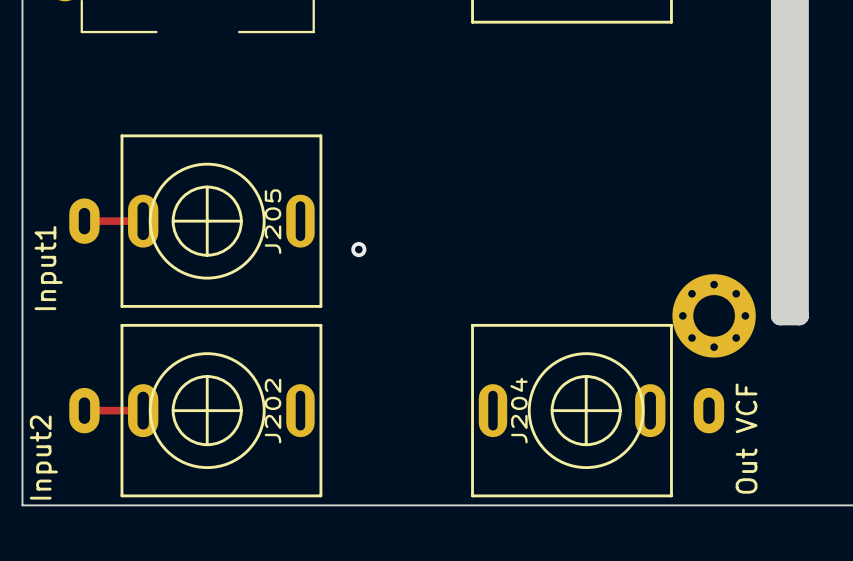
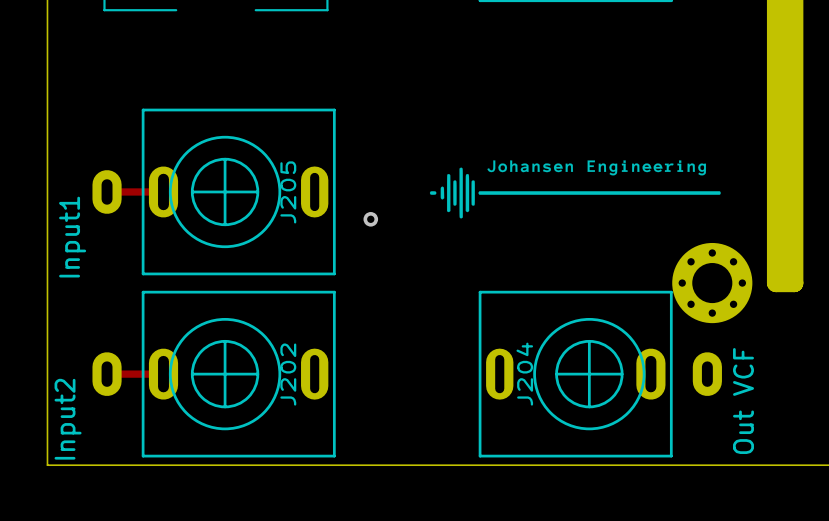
drawing: none -> [429, 160, 721, 219]

